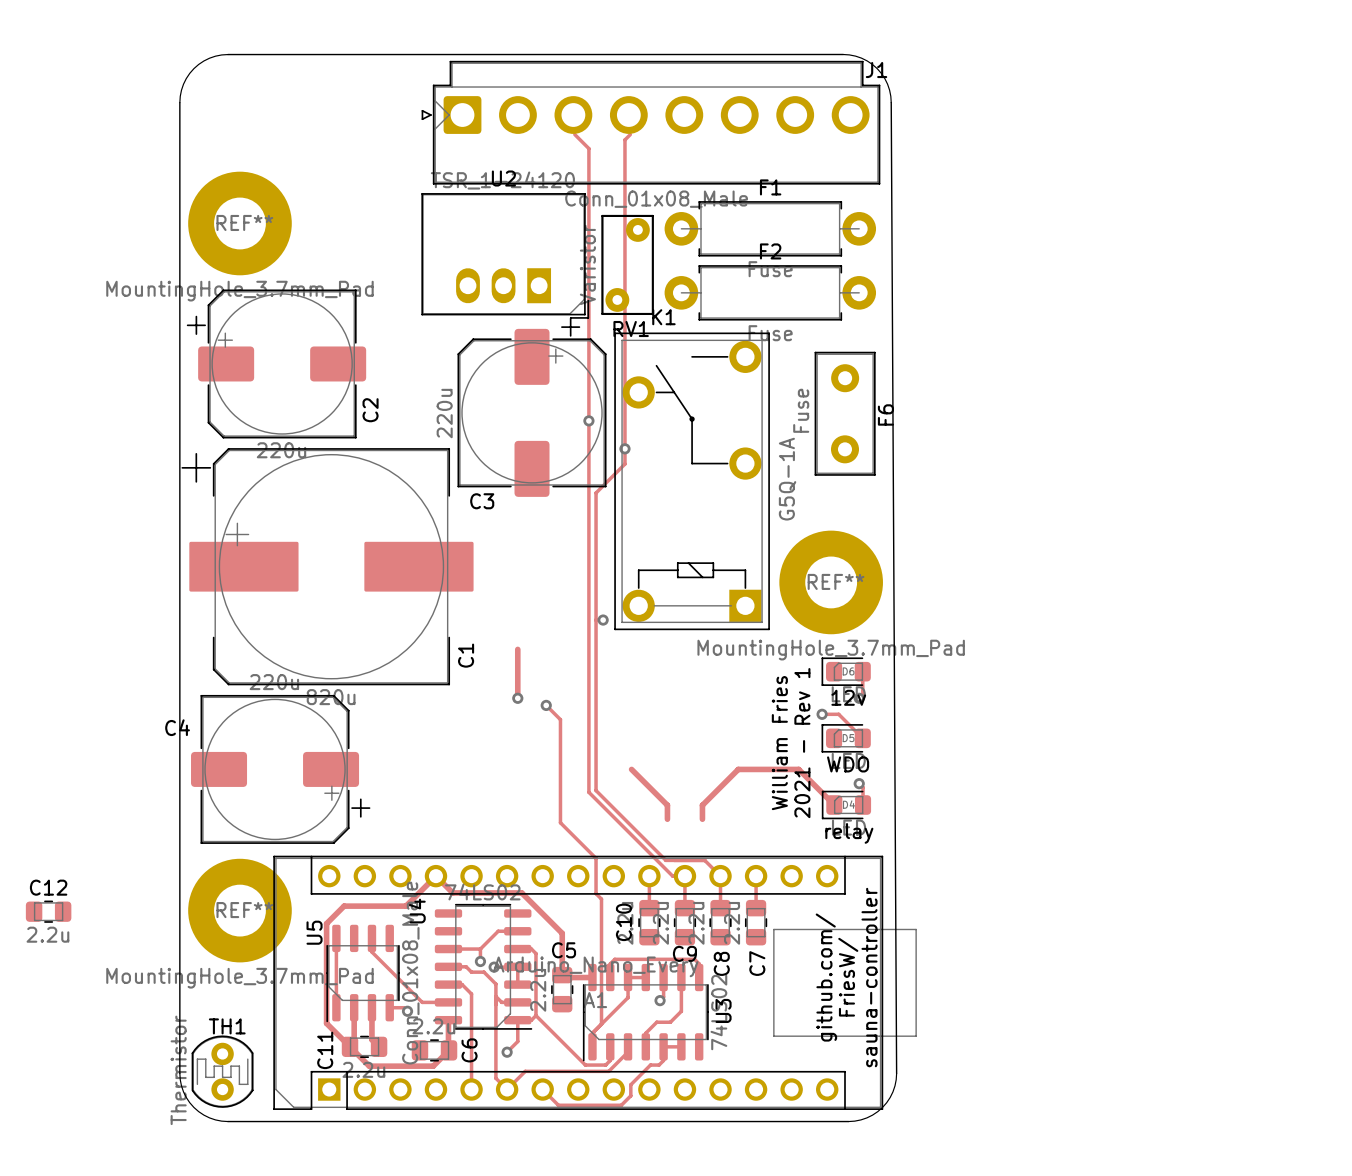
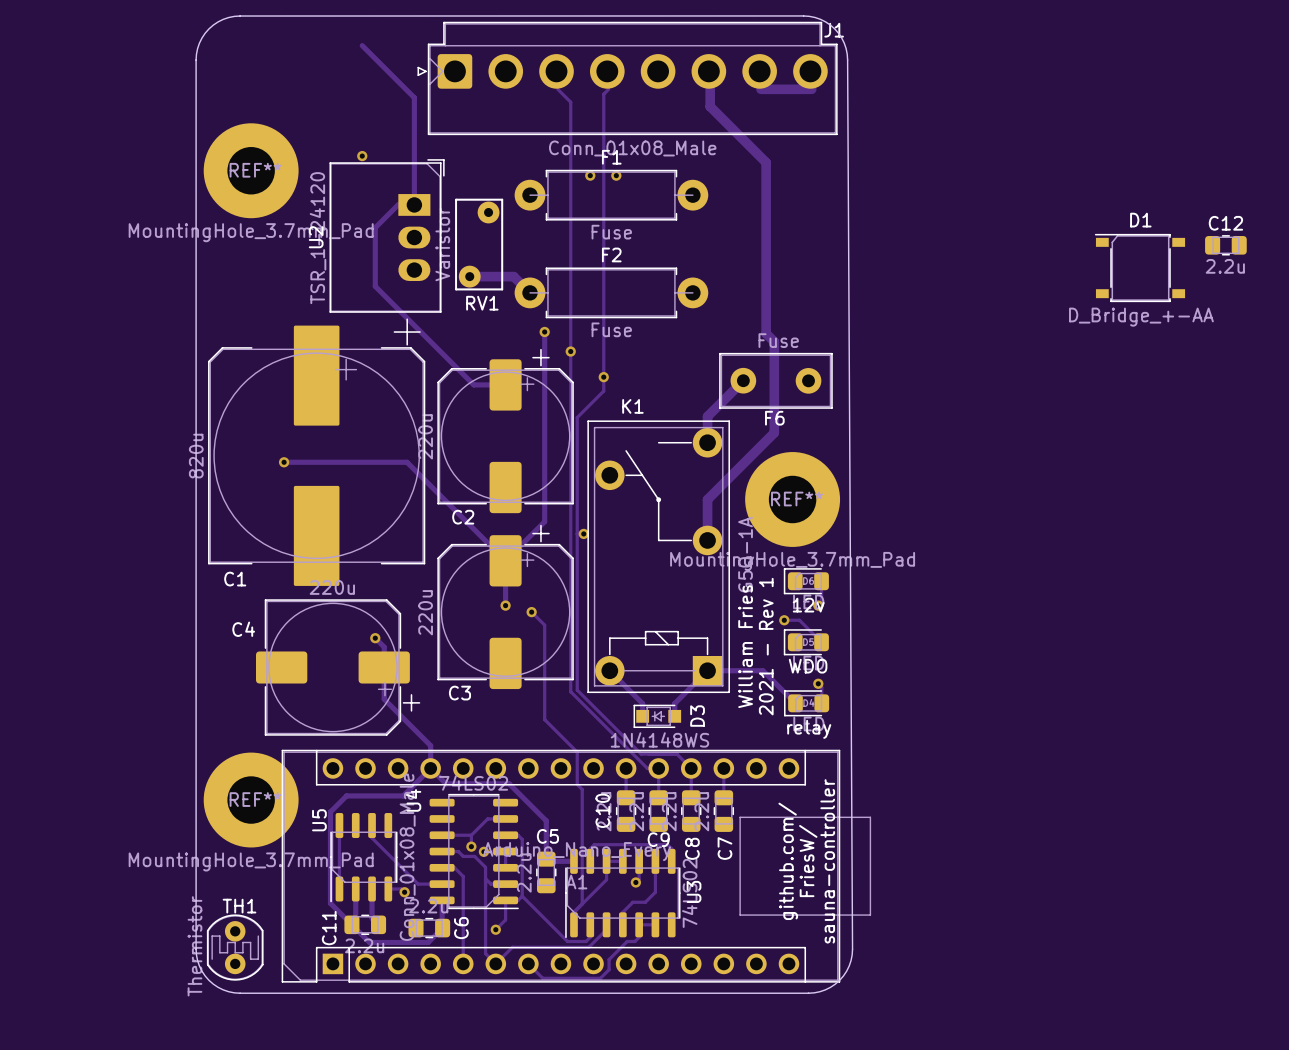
track: none -> (362, 45) (414, 97) (414, 204) (398, 204) (375, 227) (375, 286) (473, 384) (505, 384)
track: none -> (710, 89) (710, 106) (766, 162) (766, 333) (774, 341) (774, 432) (707, 499) (707, 540)
track: none -> (760, 89) (811, 89)
via: none -> (362, 156)
via: none -> (590, 175)
via: none -> (616, 175)
F1 position: (770, 228) -> (611, 195)
U2 rotation: 0° (505, 255) -> 90° counterclockwise (387, 235)
U2 position: (505, 255) -> (387, 235)
RV1 position: (627, 264) -> (479, 244)
F2 position: (770, 292) -> (611, 292)
D1: none -> D_Bridge_+-AA (1139, 268)
track: none -> (469, 276) (513, 276) (530, 292)
C2 rotation: 0° (276, 363) -> 90° clockwise (505, 431)
C2 position: (276, 363) -> (505, 431)
track: none -> (544, 331) (544, 521) (505, 560) (407, 462) (284, 462)
via: none -> (544, 331)
C3 position: (532, 407) -> (505, 606)
F6 rotation: 0° (845, 413) -> 90° clockwise (775, 380)
track: none -> (743, 380) (707, 416) (707, 442)
K1 position: (692, 481) -> (658, 556)
via: none -> (284, 462)
C1 rotation: 0° (327, 566) -> 90° clockwise (316, 452)
track: none -> (375, 638) (384, 647) (384, 699) (430, 745) (430, 768)
via: none -> (375, 638)
C4 position: (280, 769) -> (338, 667)
D3: none -> 1N4148WS (657, 716)
C12 position: (48, 911) -> (1225, 245)

